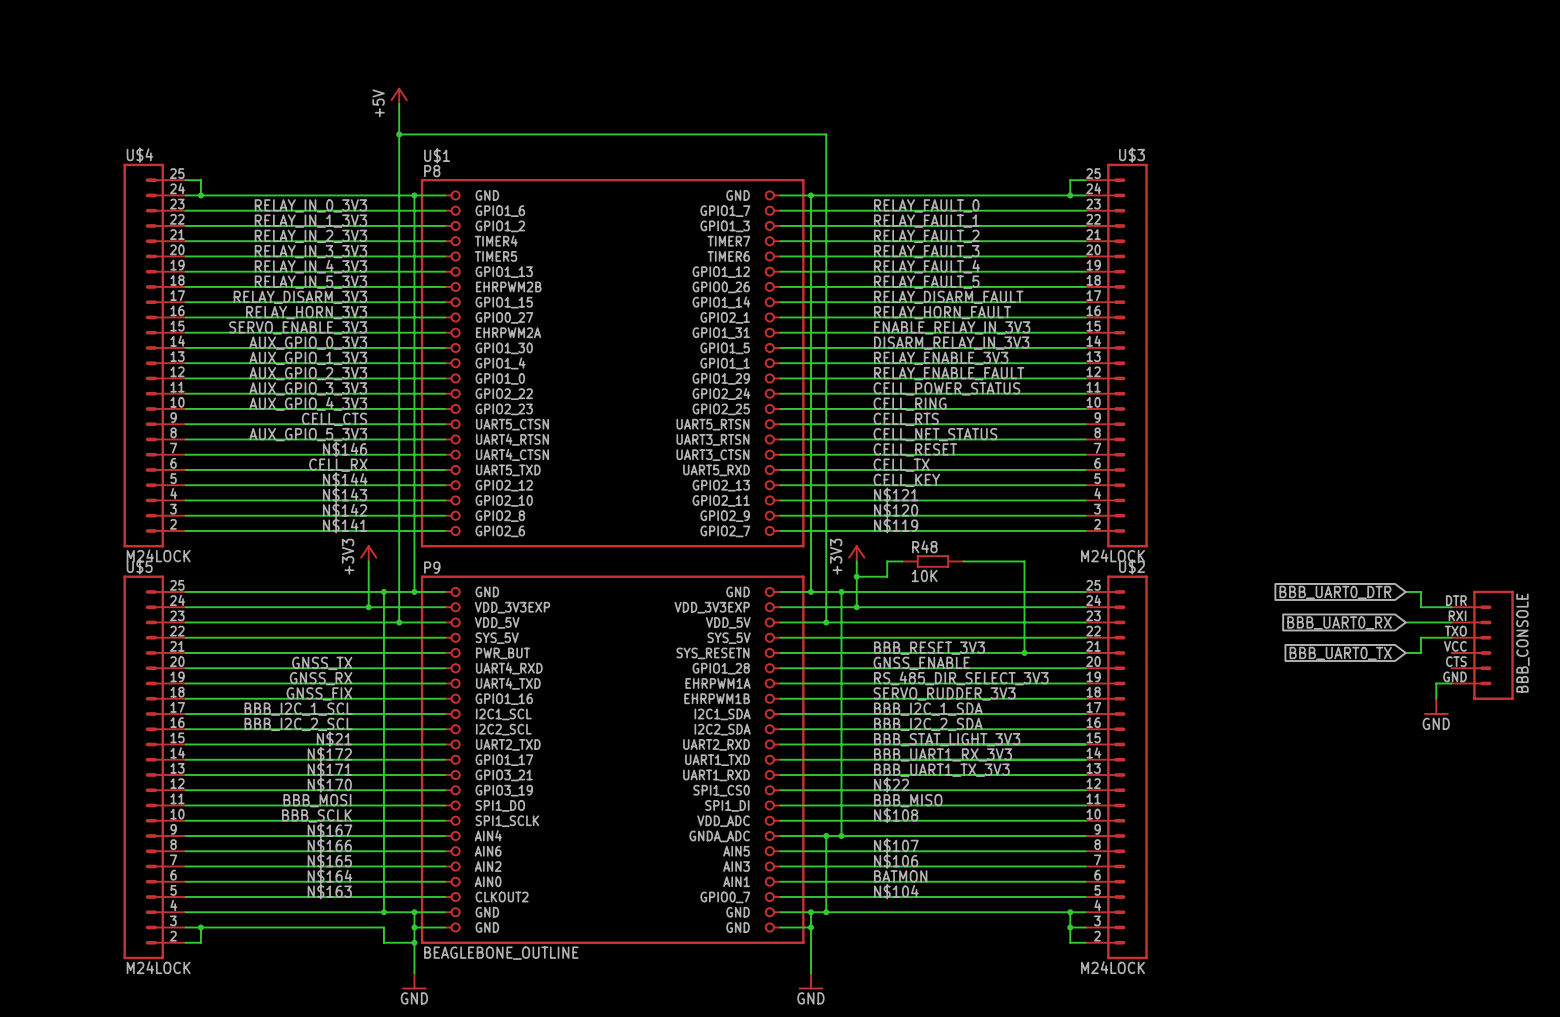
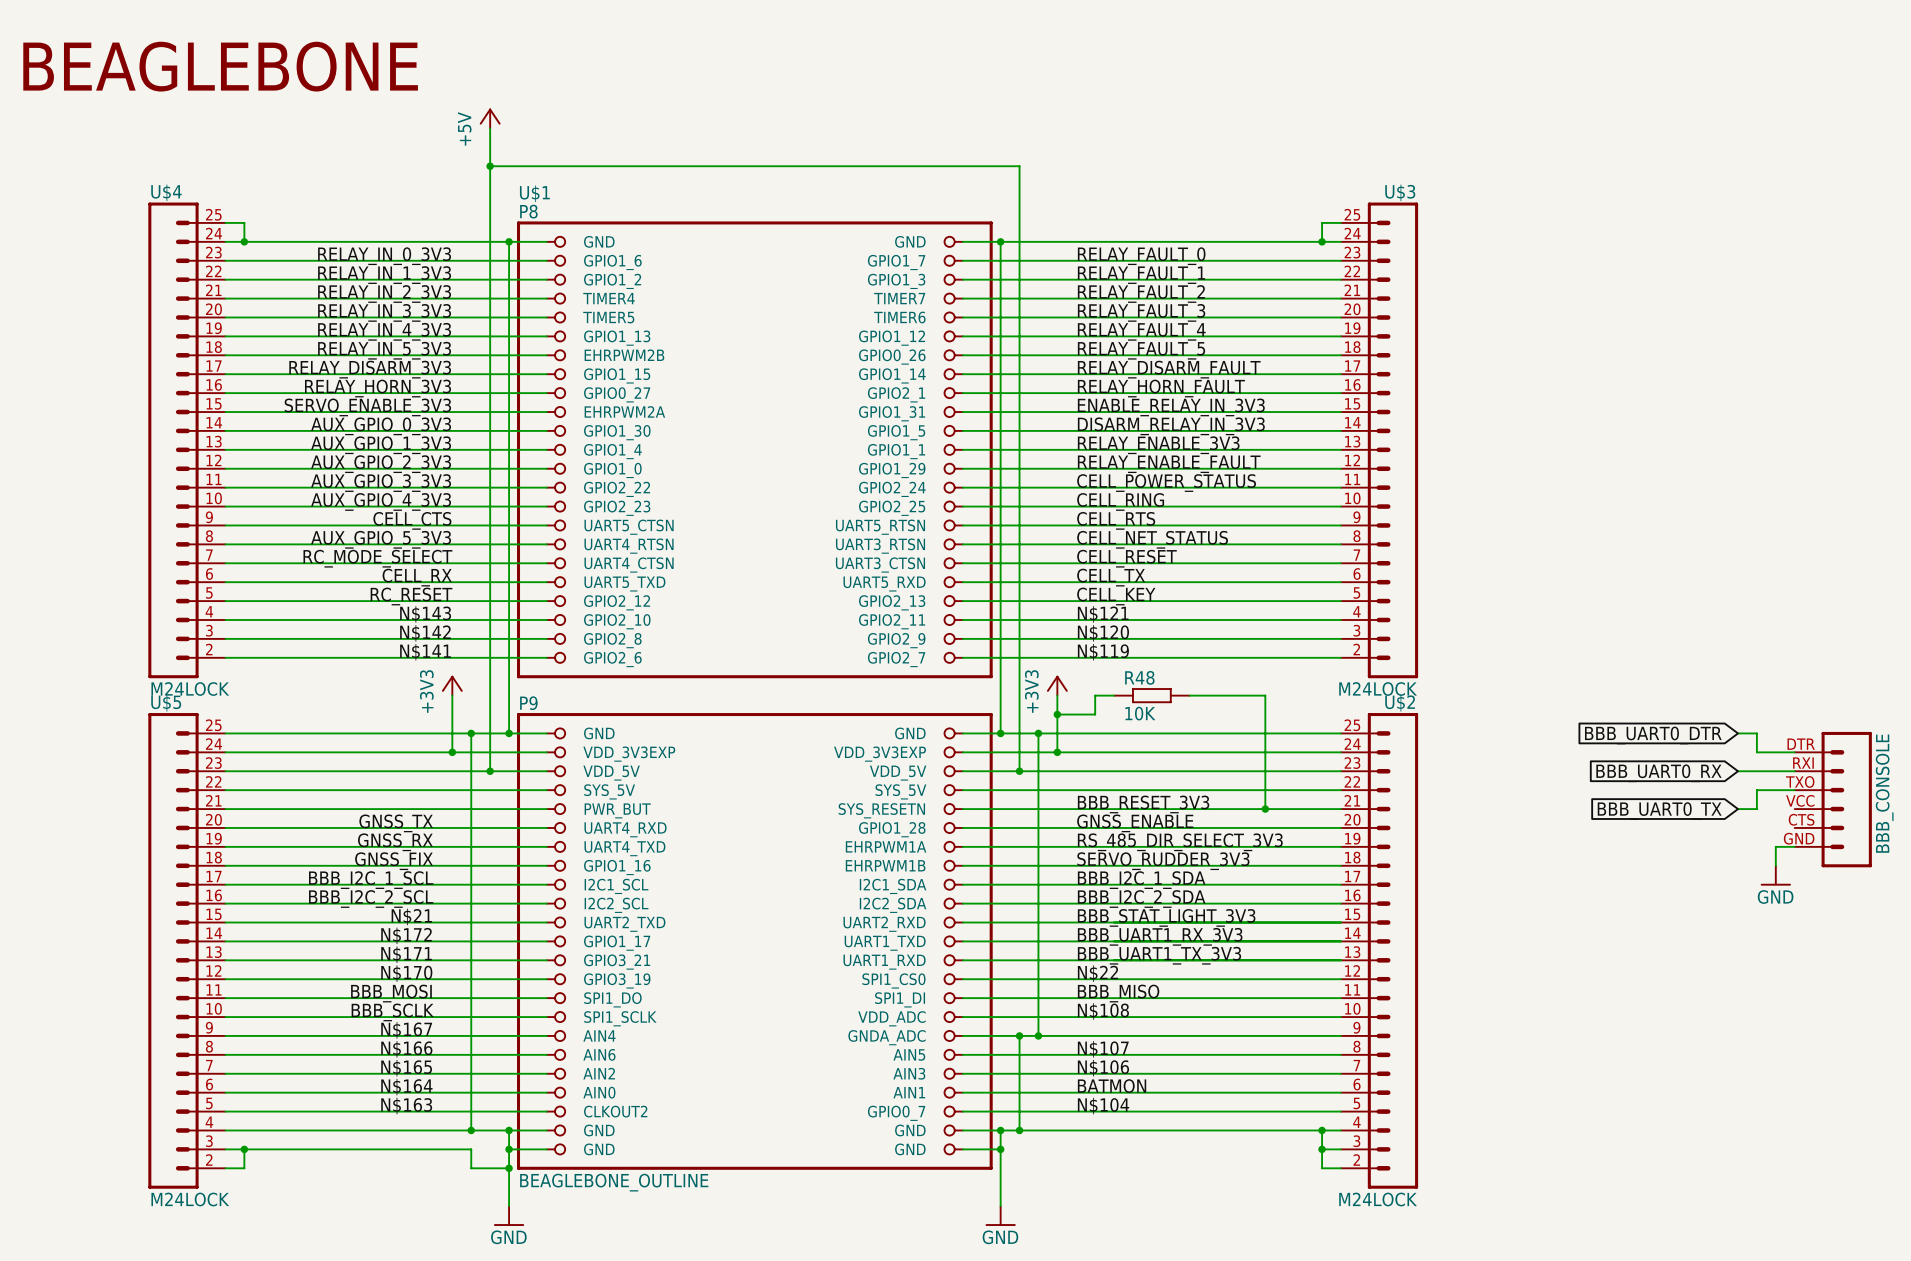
text: none -> BEAGLEBONE (220, 66)
label: N$146 (345, 449) -> RC_MODE_SELECT (377, 558)
label: N$144 (345, 479) -> RC_RESET (411, 596)

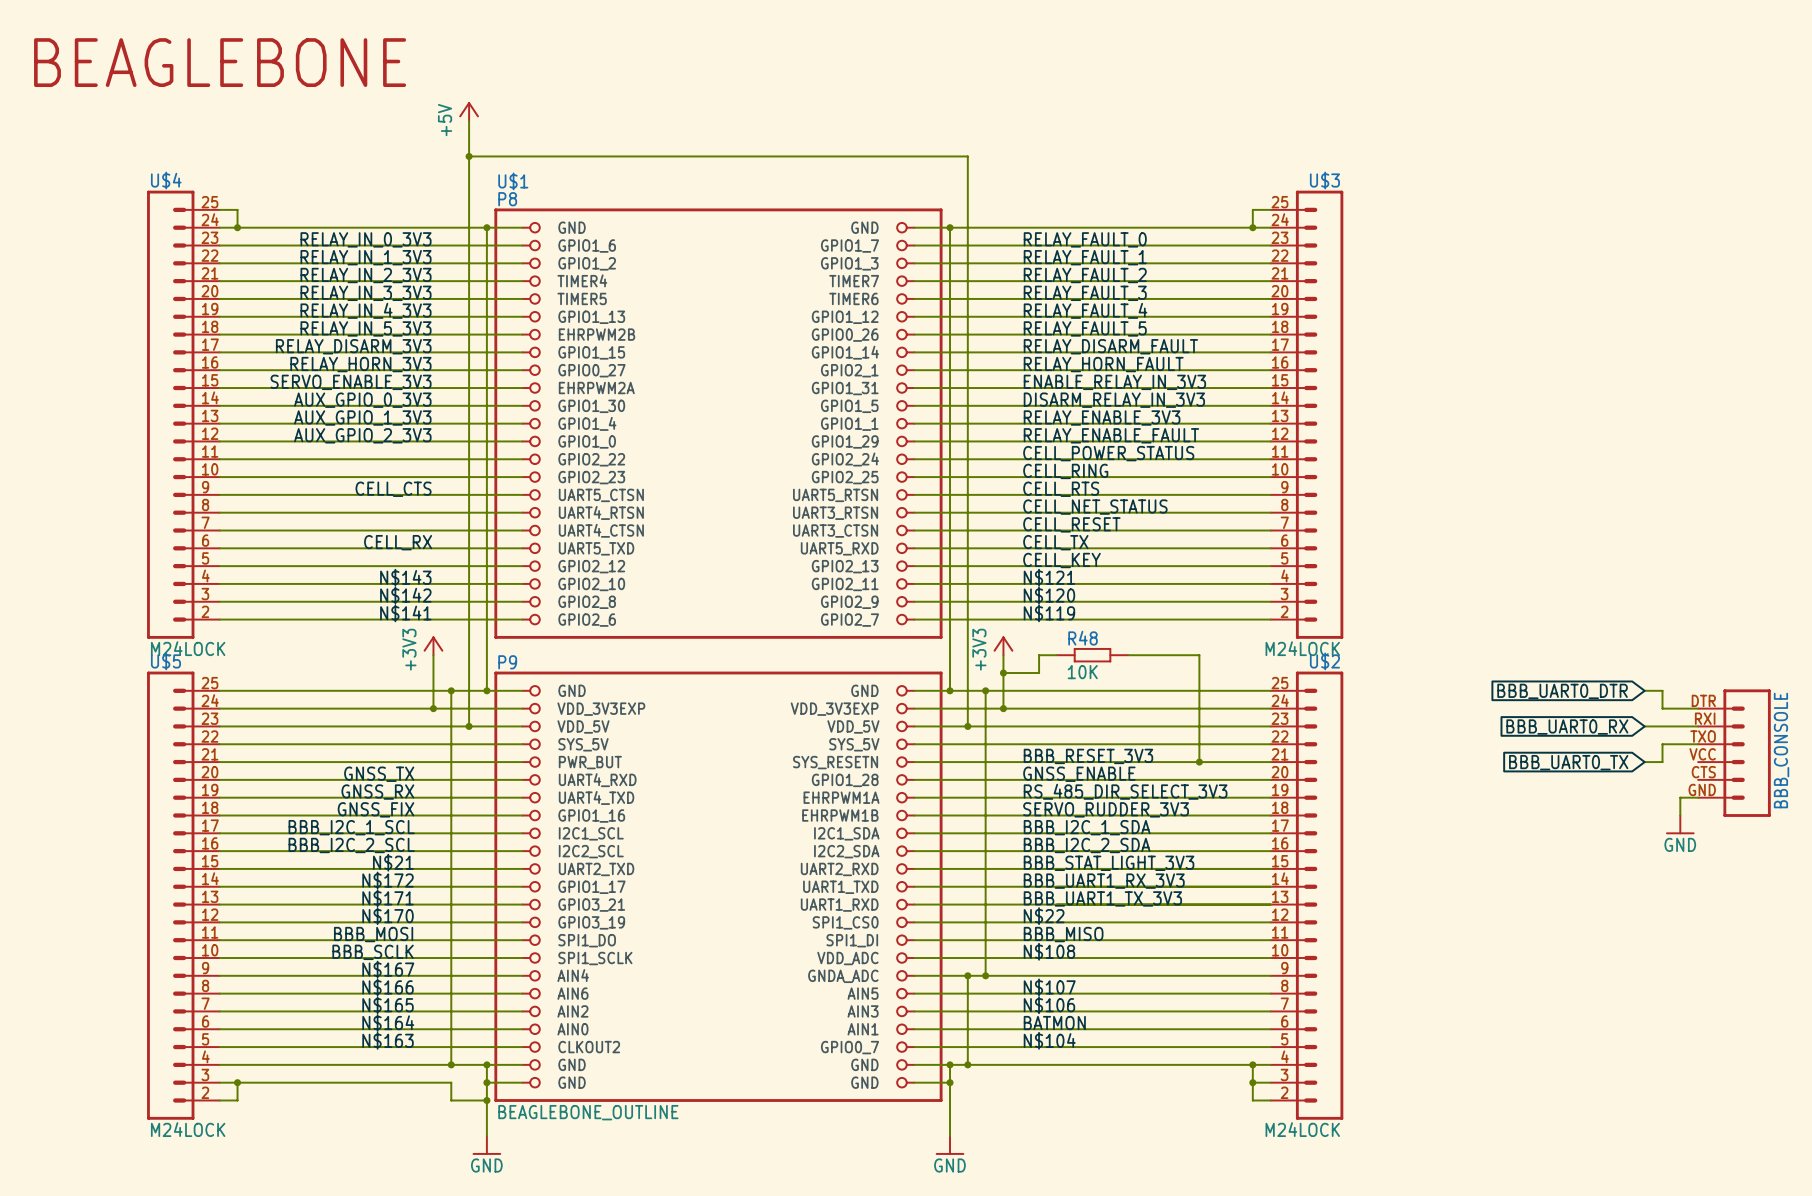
label: AUX_GPIO_3_3V3 (381, 483) -> none
label: AUX_GPIO_4_3V3 (381, 501) -> none
label: AUX_GPIO_5_3V3 (381, 539) -> none
label: RC_MODE_SELECT (377, 558) -> none
label: RC_RESET (411, 596) -> none

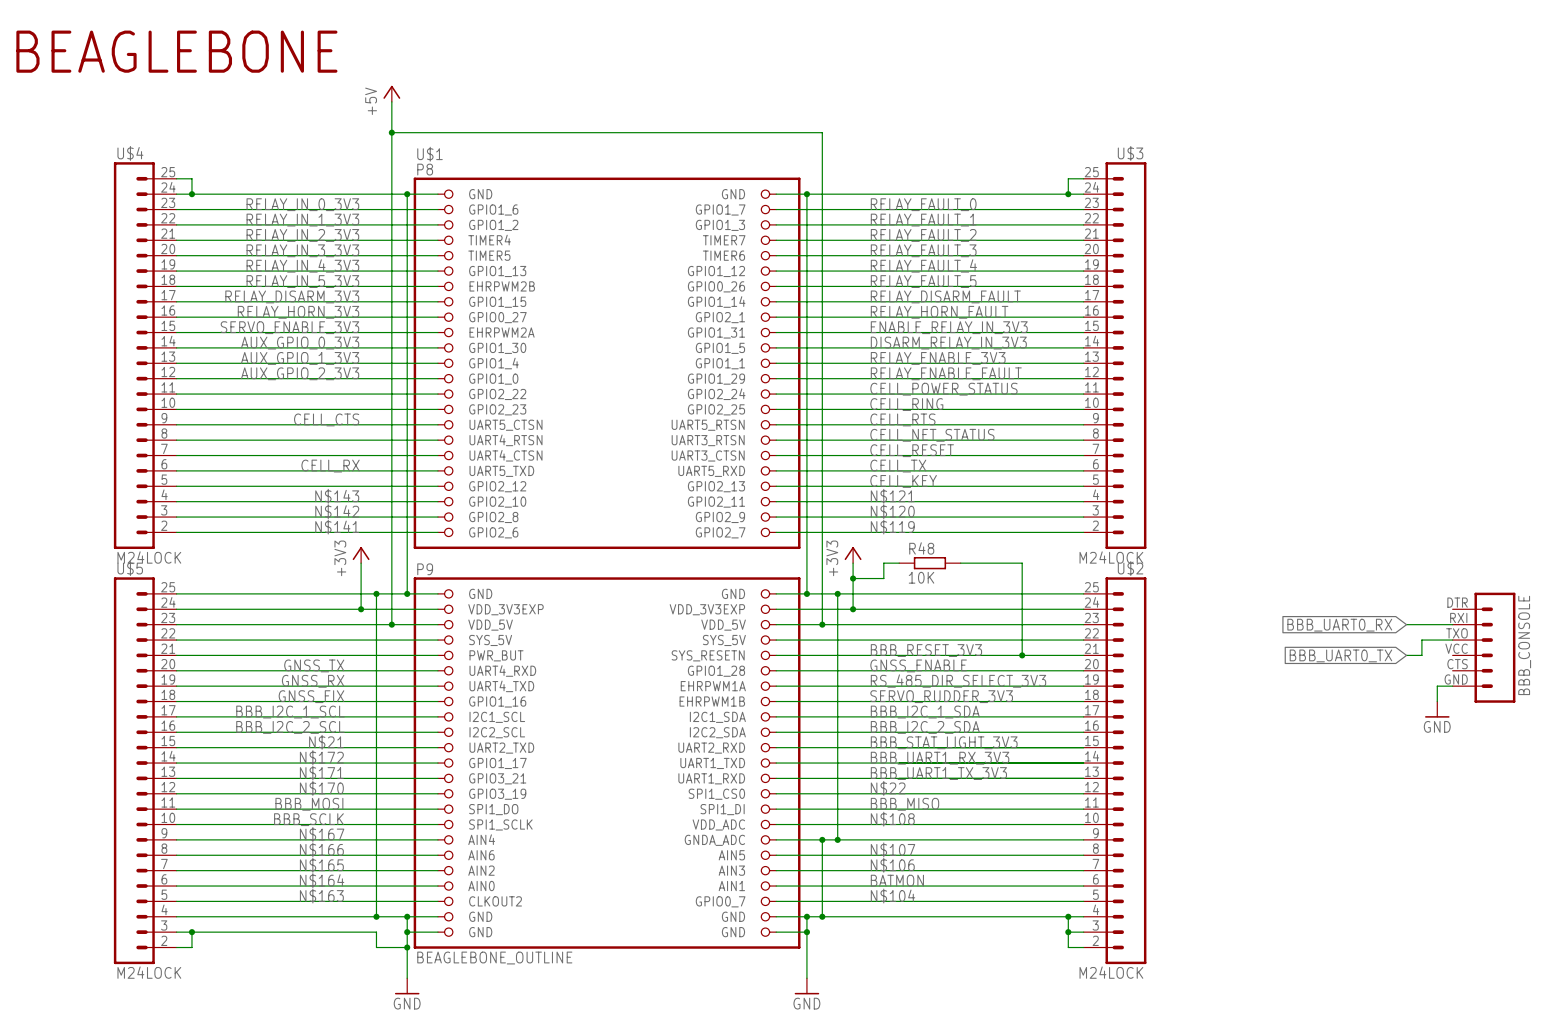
wire: (1644, 690) (1662, 690) (1662, 708) (1698, 708) -> none
global label: BBB_UART0_DTR (1562, 691) -> none

